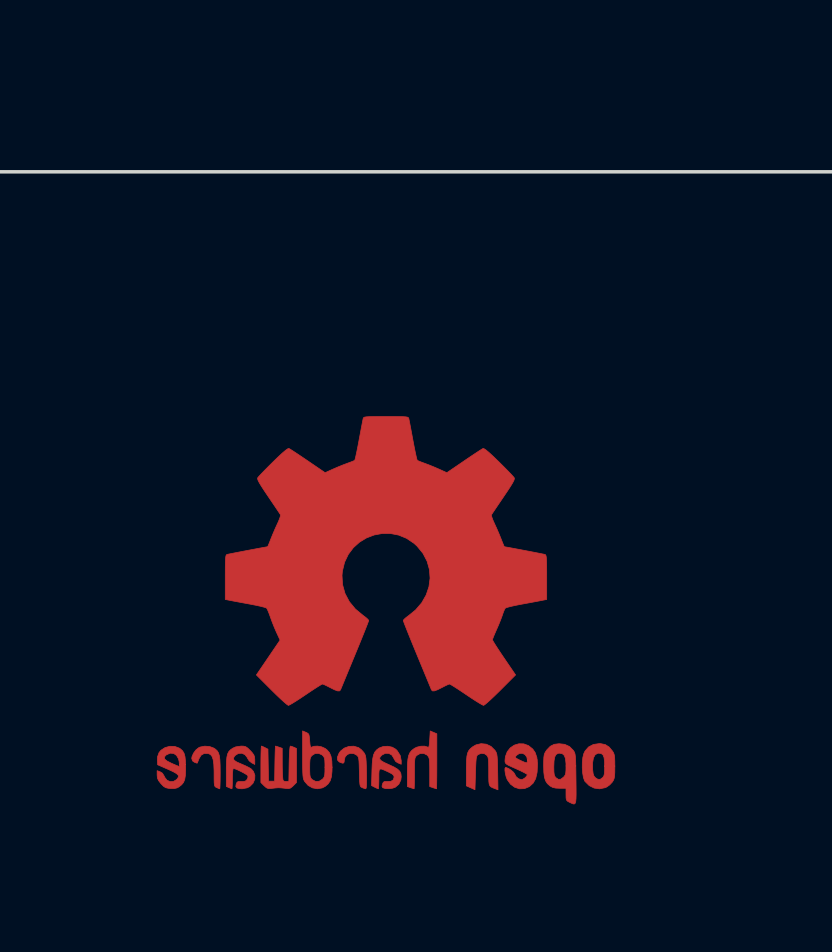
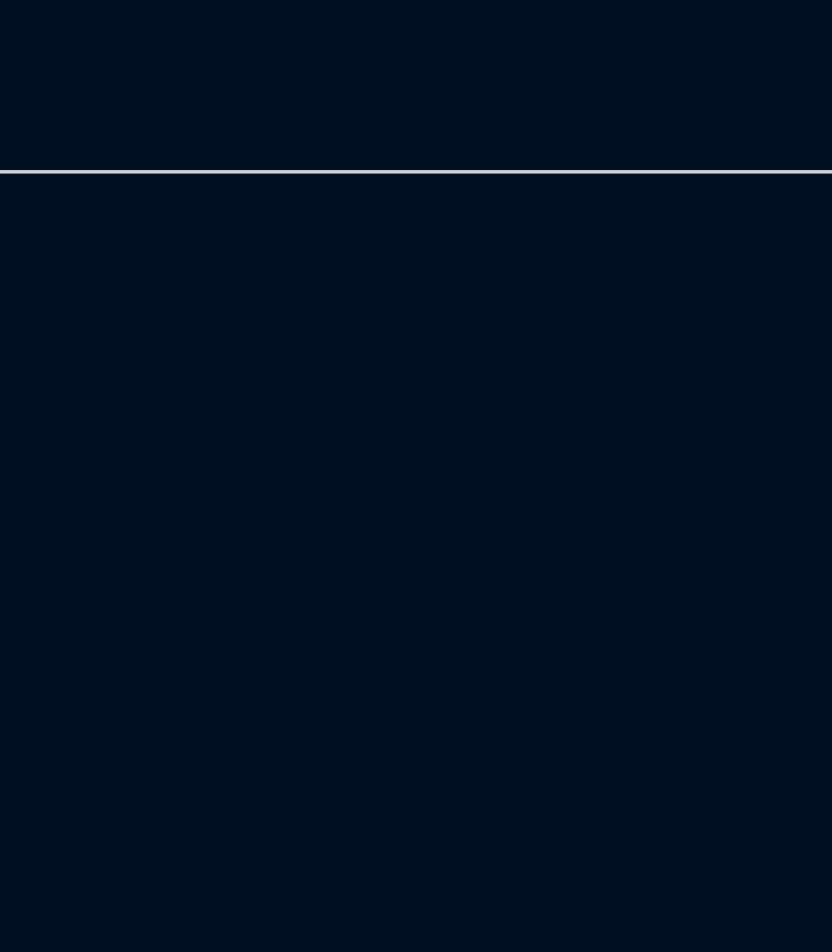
drawing: [156, 416, 616, 805] -> none

